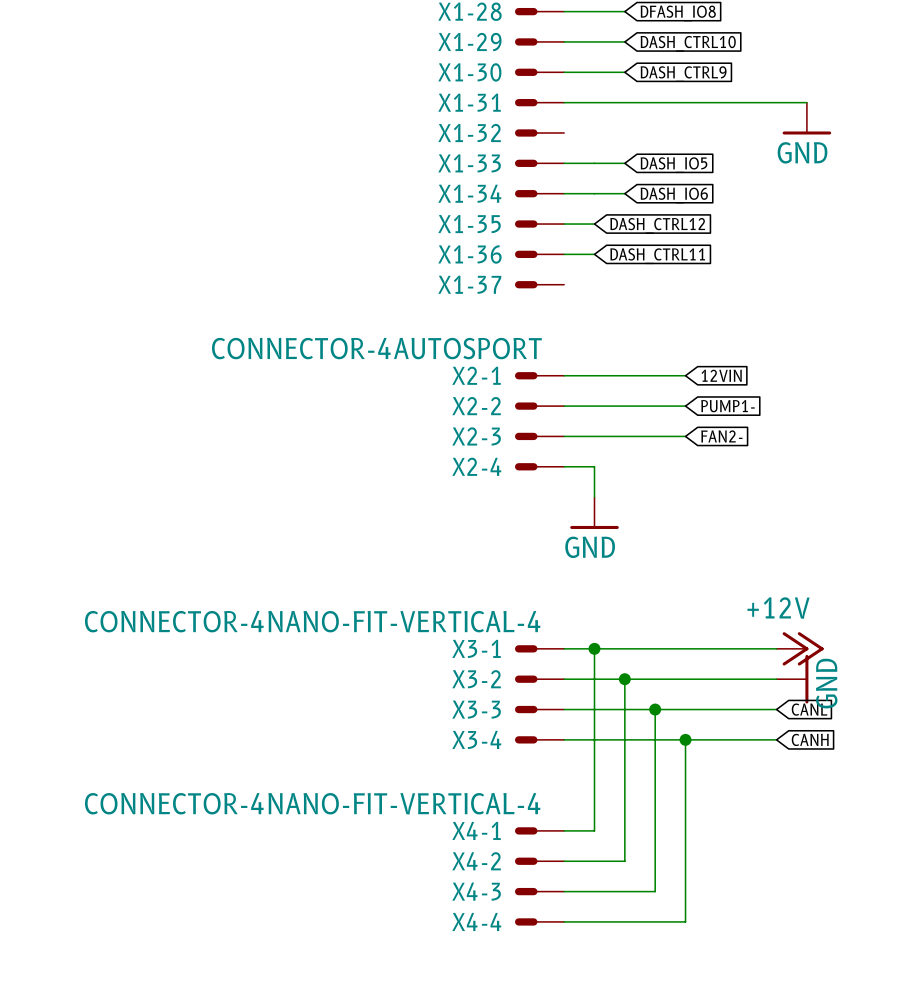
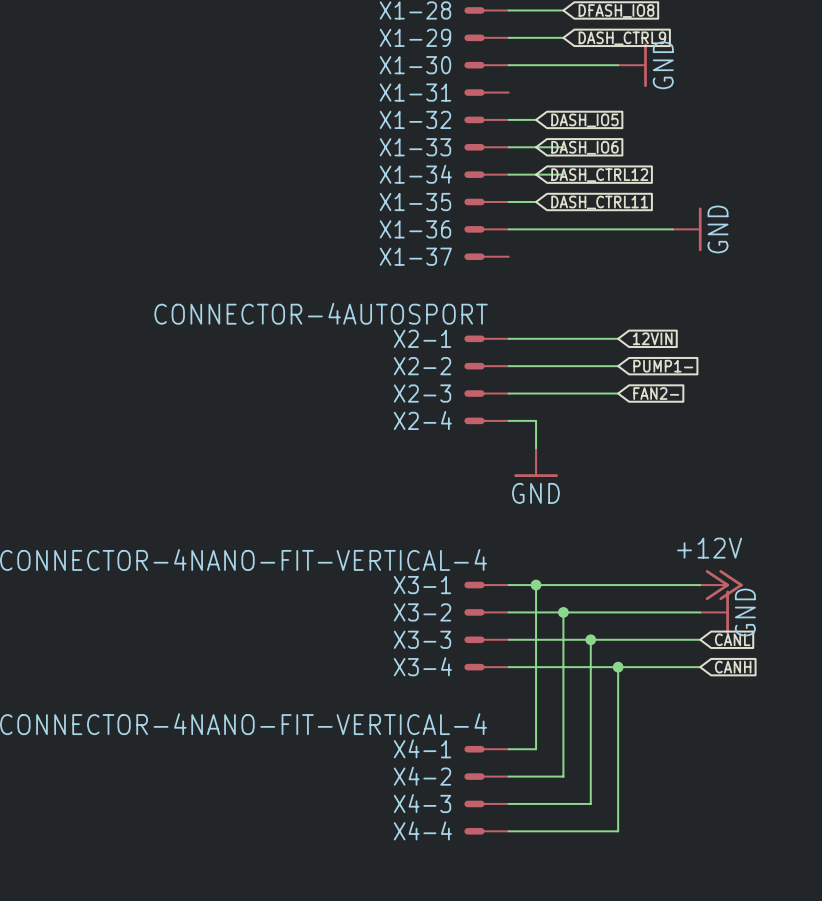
global label: DASH_CTRL10 (688, 43) -> DASH_CTRL9 (622, 38)
wire: none -> (563, 65) (618, 65)
power symbol: none -> GND (632, 65)
global label: DASH_CTRL9 (683, 74) -> none
wire: (564, 102) (806, 102) -> none
power symbol: GND (806, 118) -> none
wire: none -> (508, 119) (536, 119)
global label position: DASH_IO5 (673, 165) -> DASH_IO5 (584, 120)
global label: none -> DASH_CTRL12 (599, 175)
global label position: DASH_IO6 (674, 195) -> DASH_IO6 (584, 147)
global label: DASH_CTRL12 (657, 225) -> DASH_CTRL11 (599, 202)
wire: none -> (536, 229) (672, 229)
power symbol: none -> GND (687, 229)
global label: DASH_CTRL11 (657, 256) -> none

